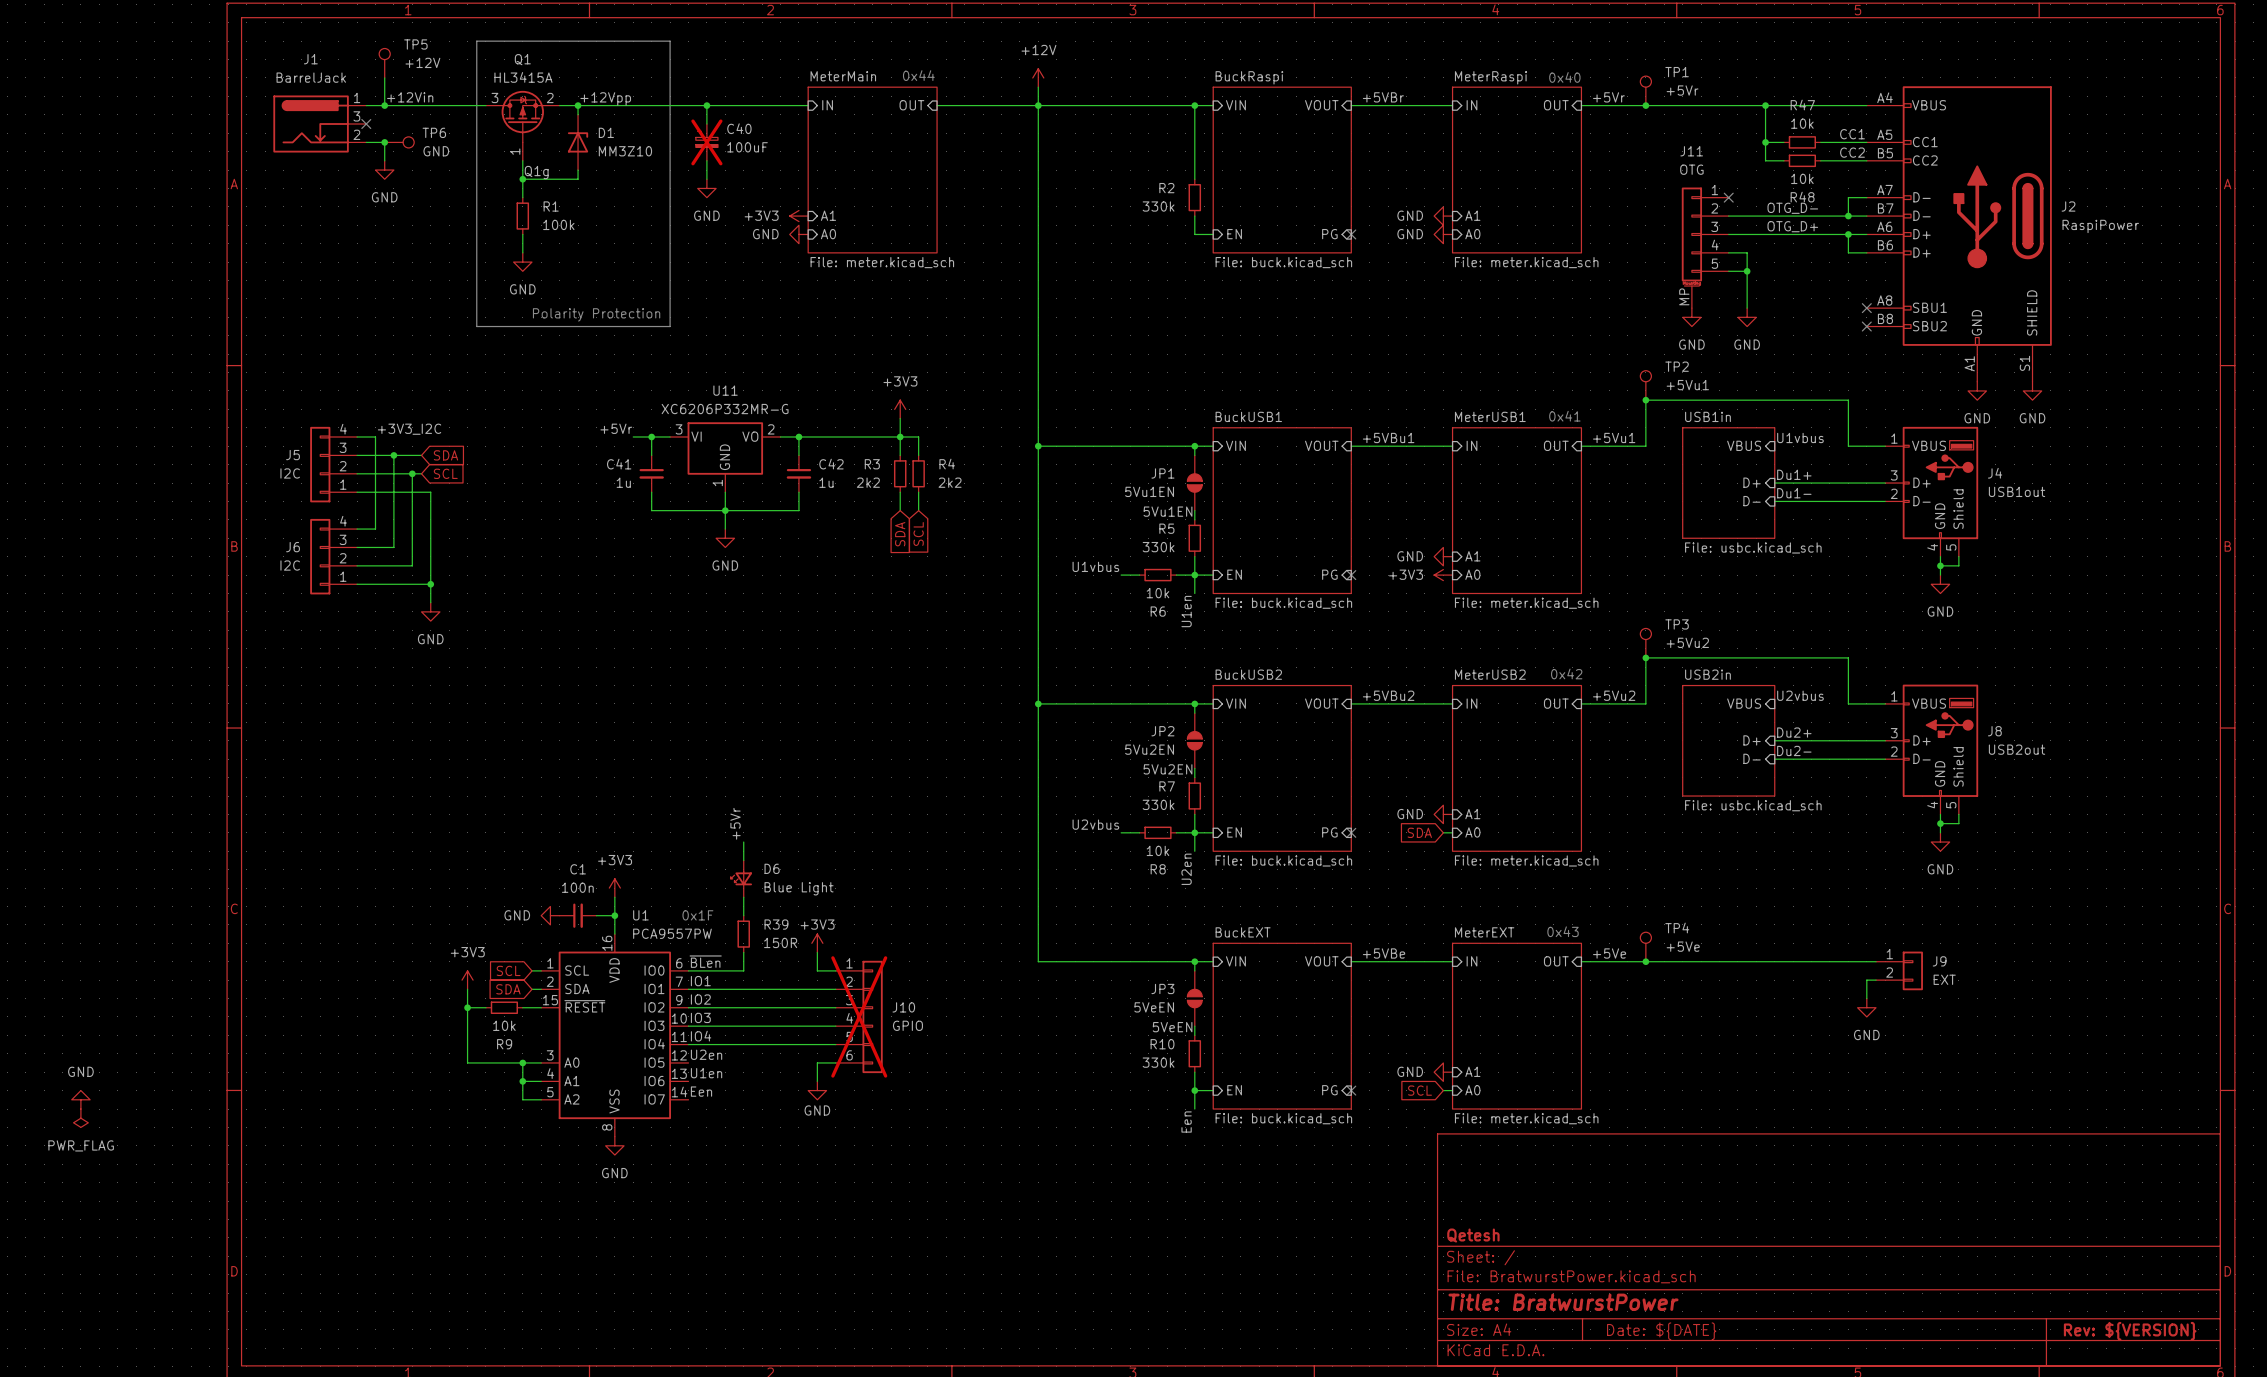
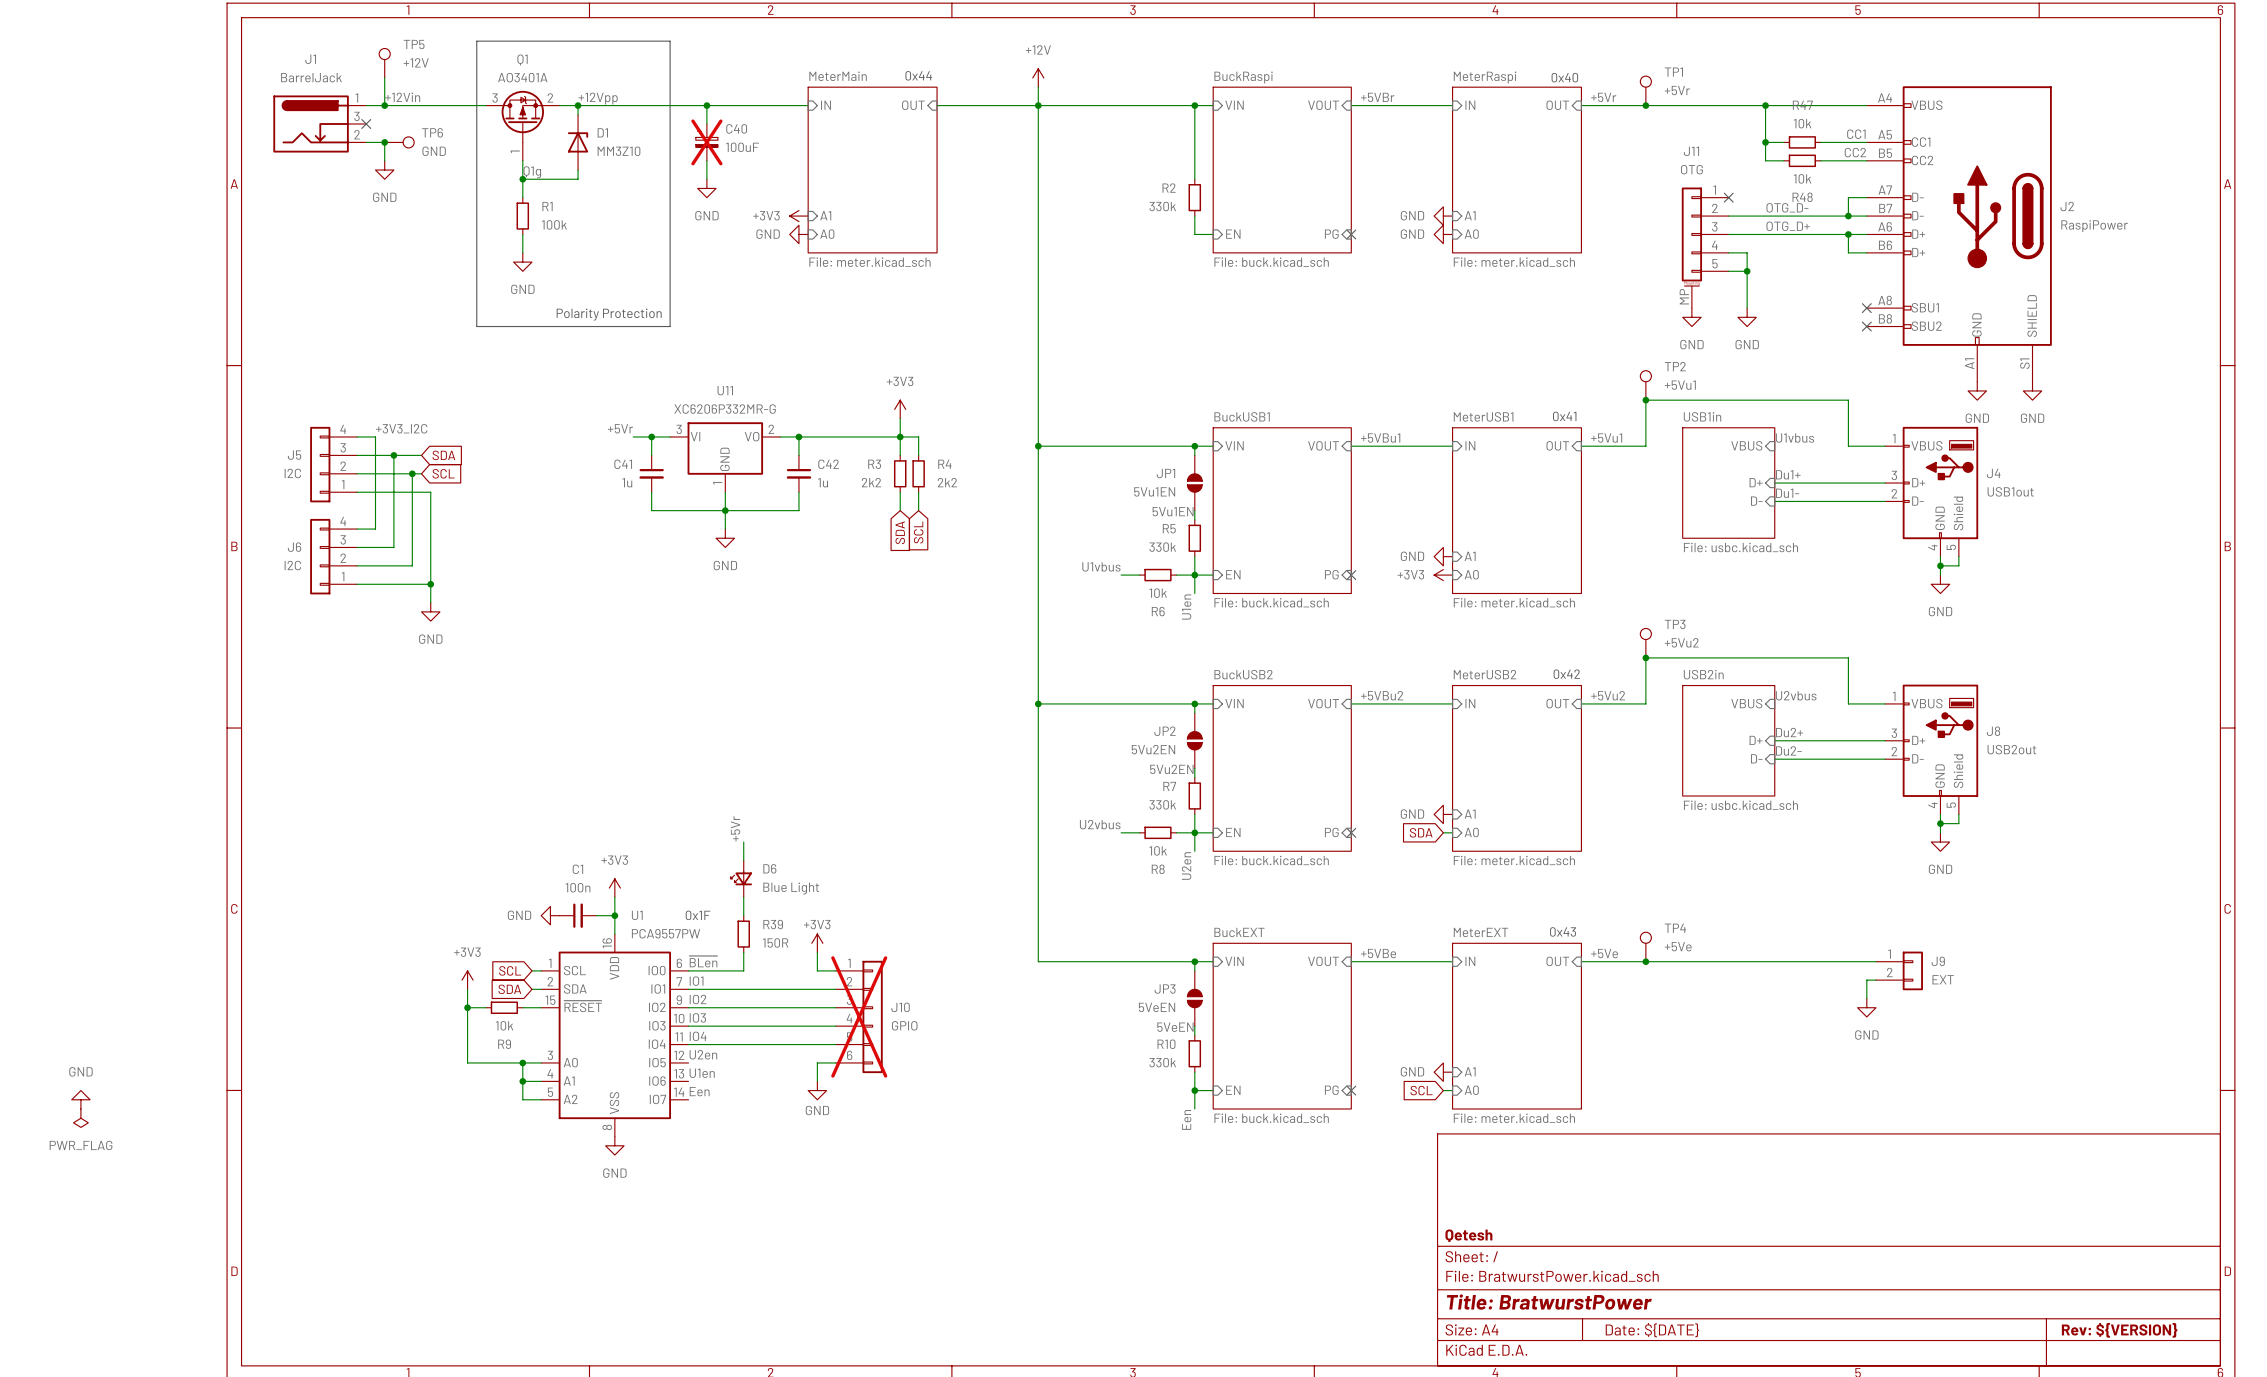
Q1 value: HL3415A (523, 77) -> AO3401A (522, 77)

